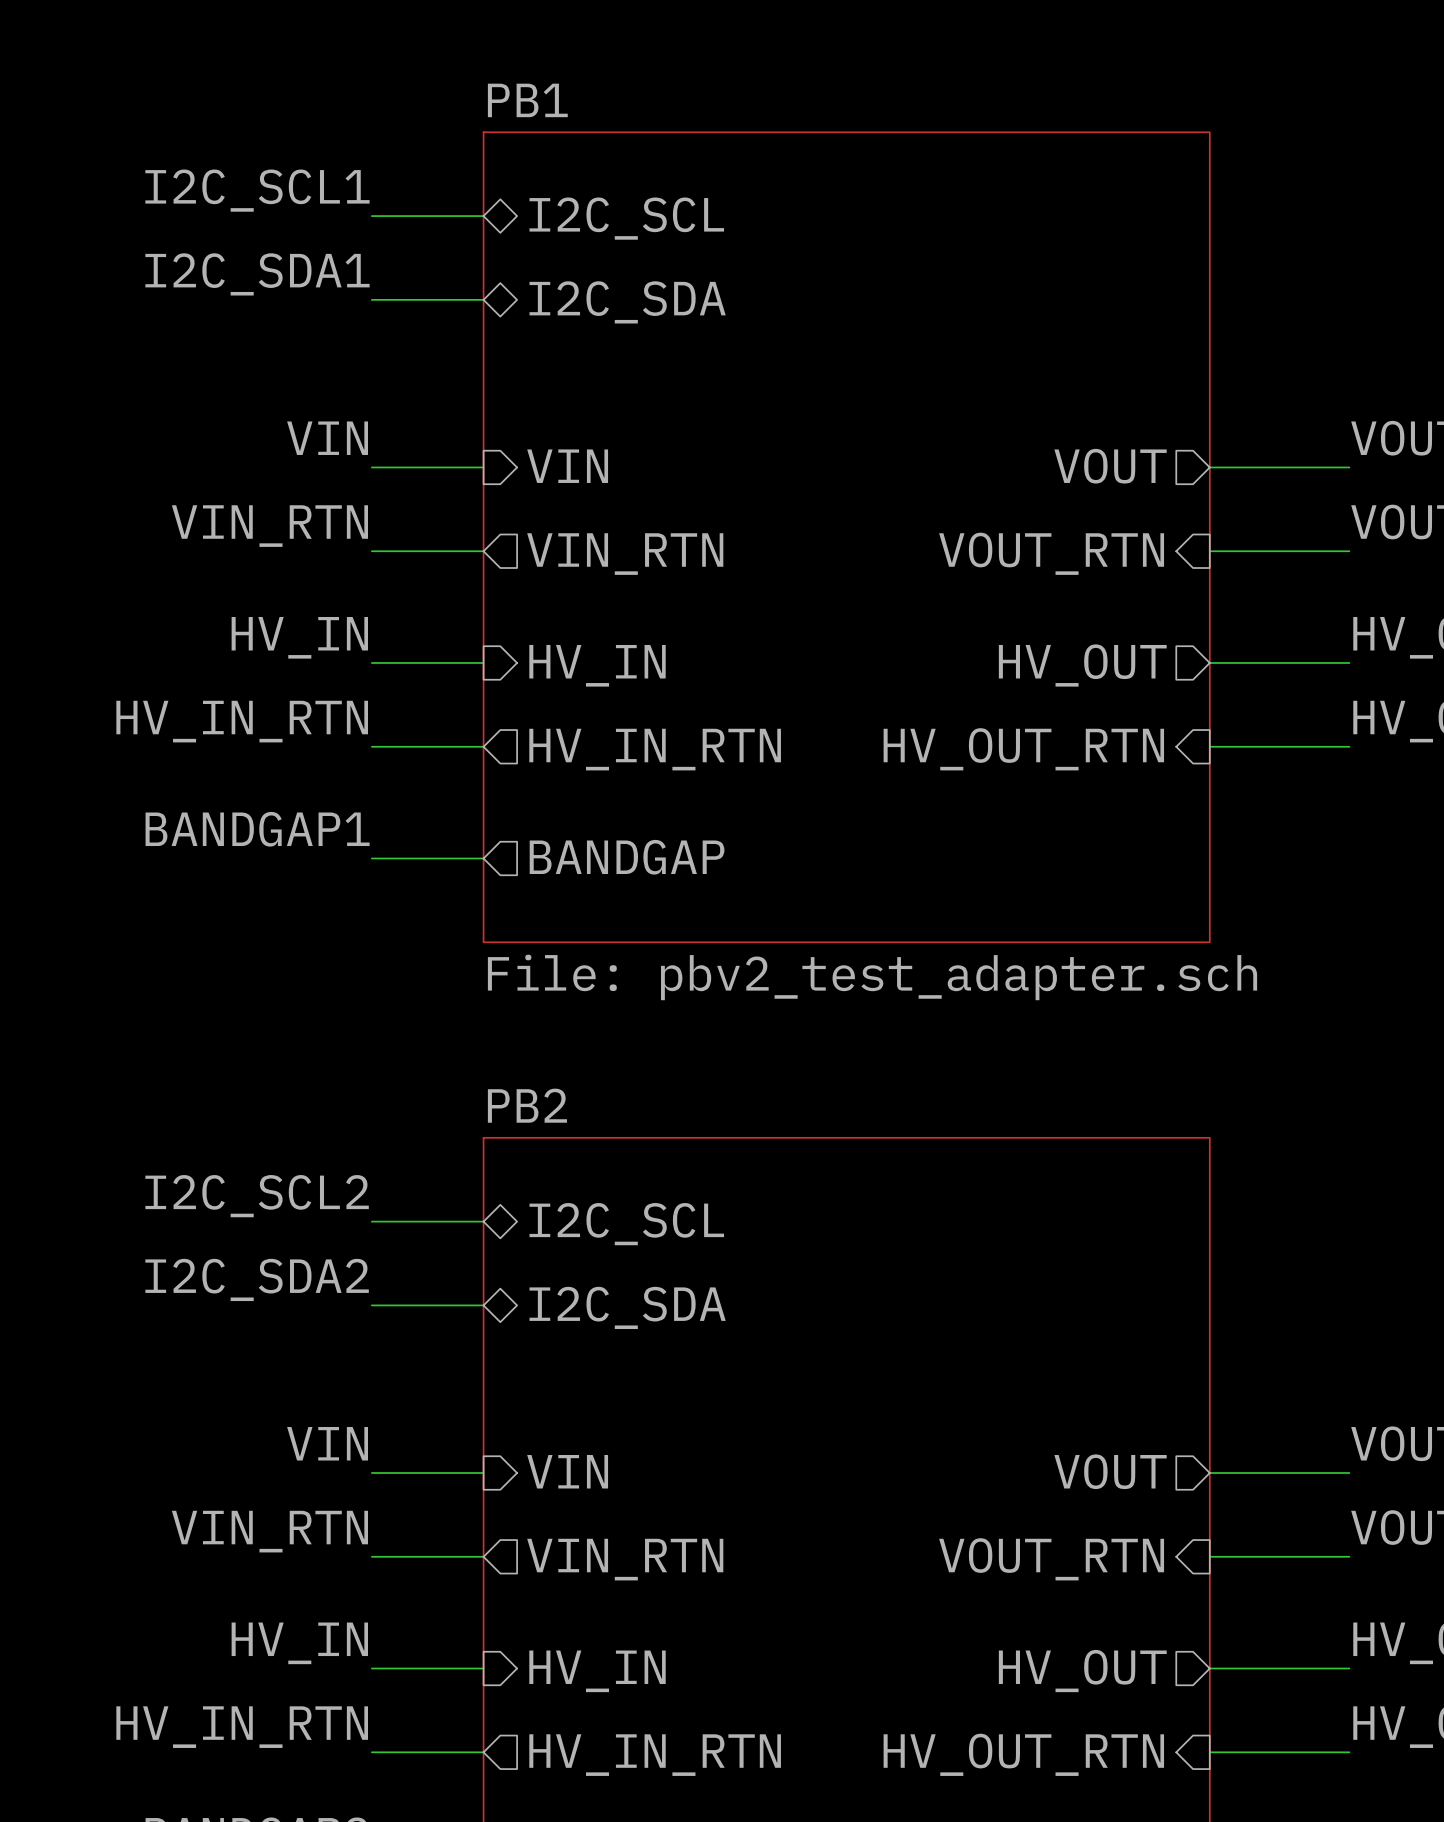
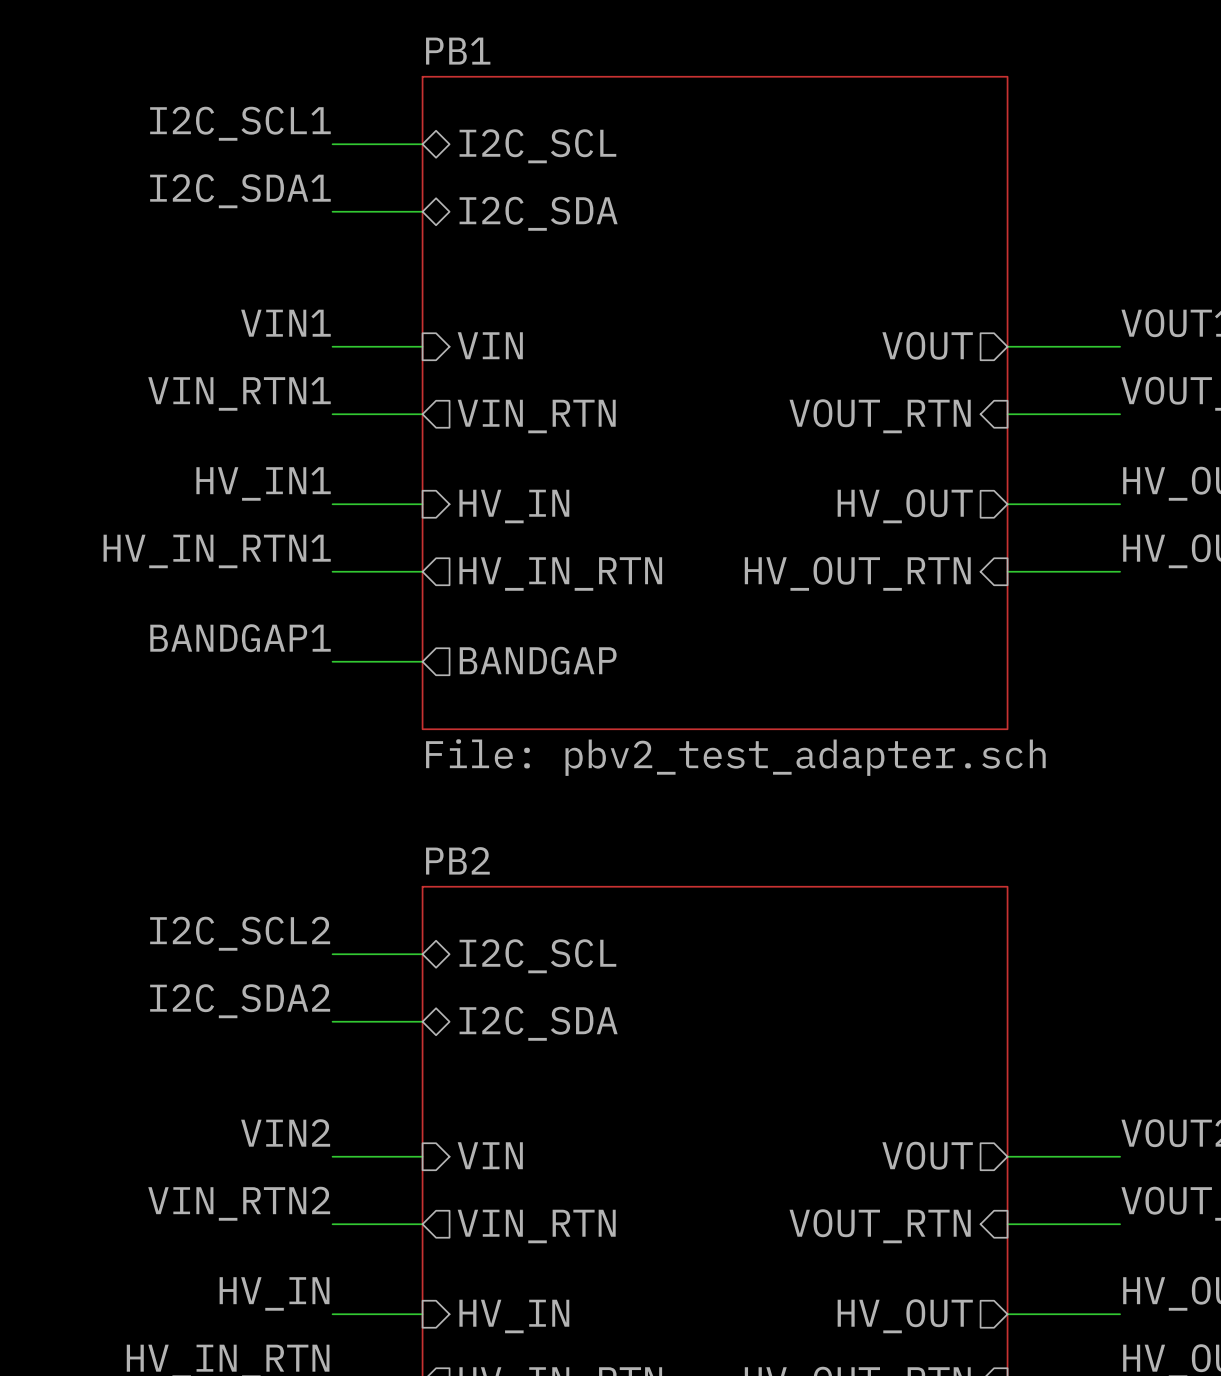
label: VIN (327, 438) -> VIN1 (285, 323)
label: VIN_RTN (269, 526) -> VIN_RTN1 (239, 393)
label: HV_IN (299, 637) -> HV_IN1 (263, 483)
label: HV_IN_RTN (242, 721) -> HV_IN_RTN1 (217, 551)
label: VIN (327, 1443) -> VIN2 (285, 1132)
label: VIN_RTN (269, 1531) -> VIN_RTN2 (239, 1203)

